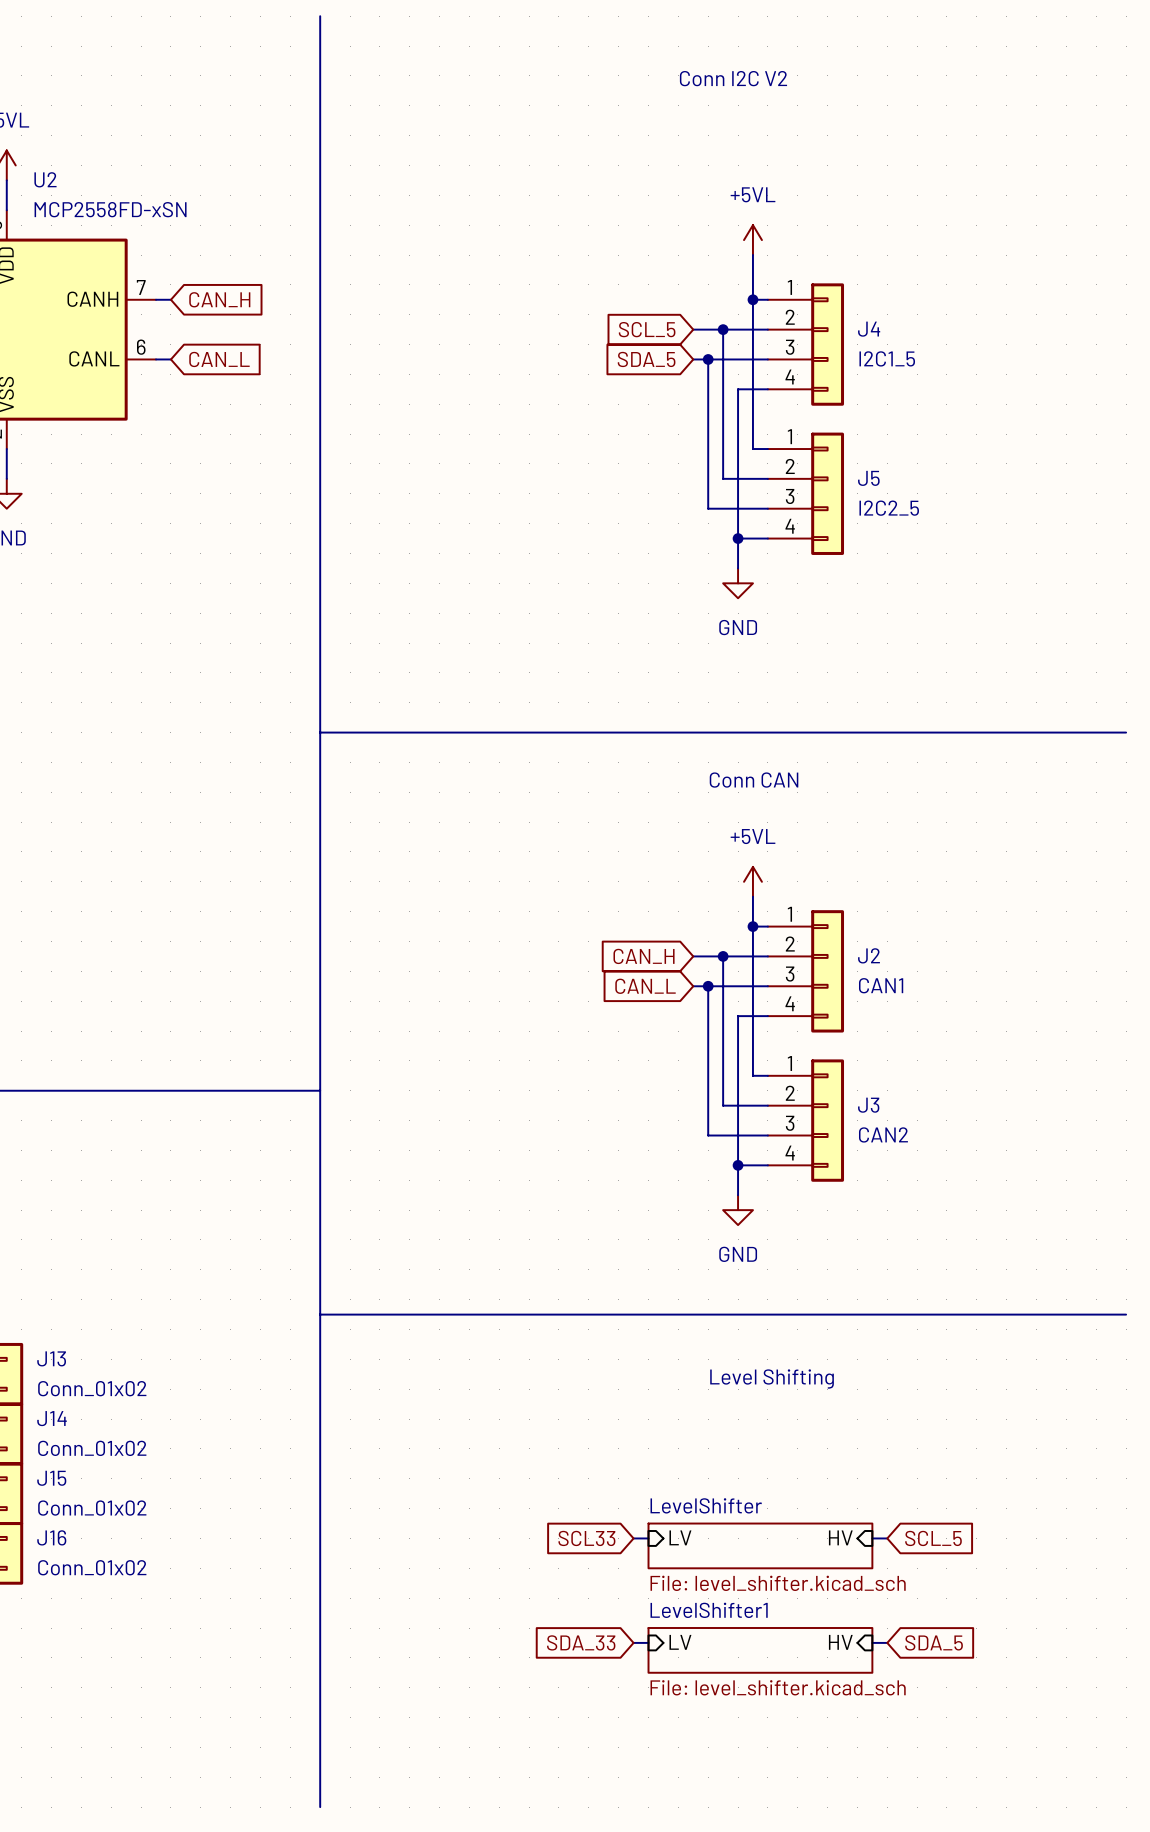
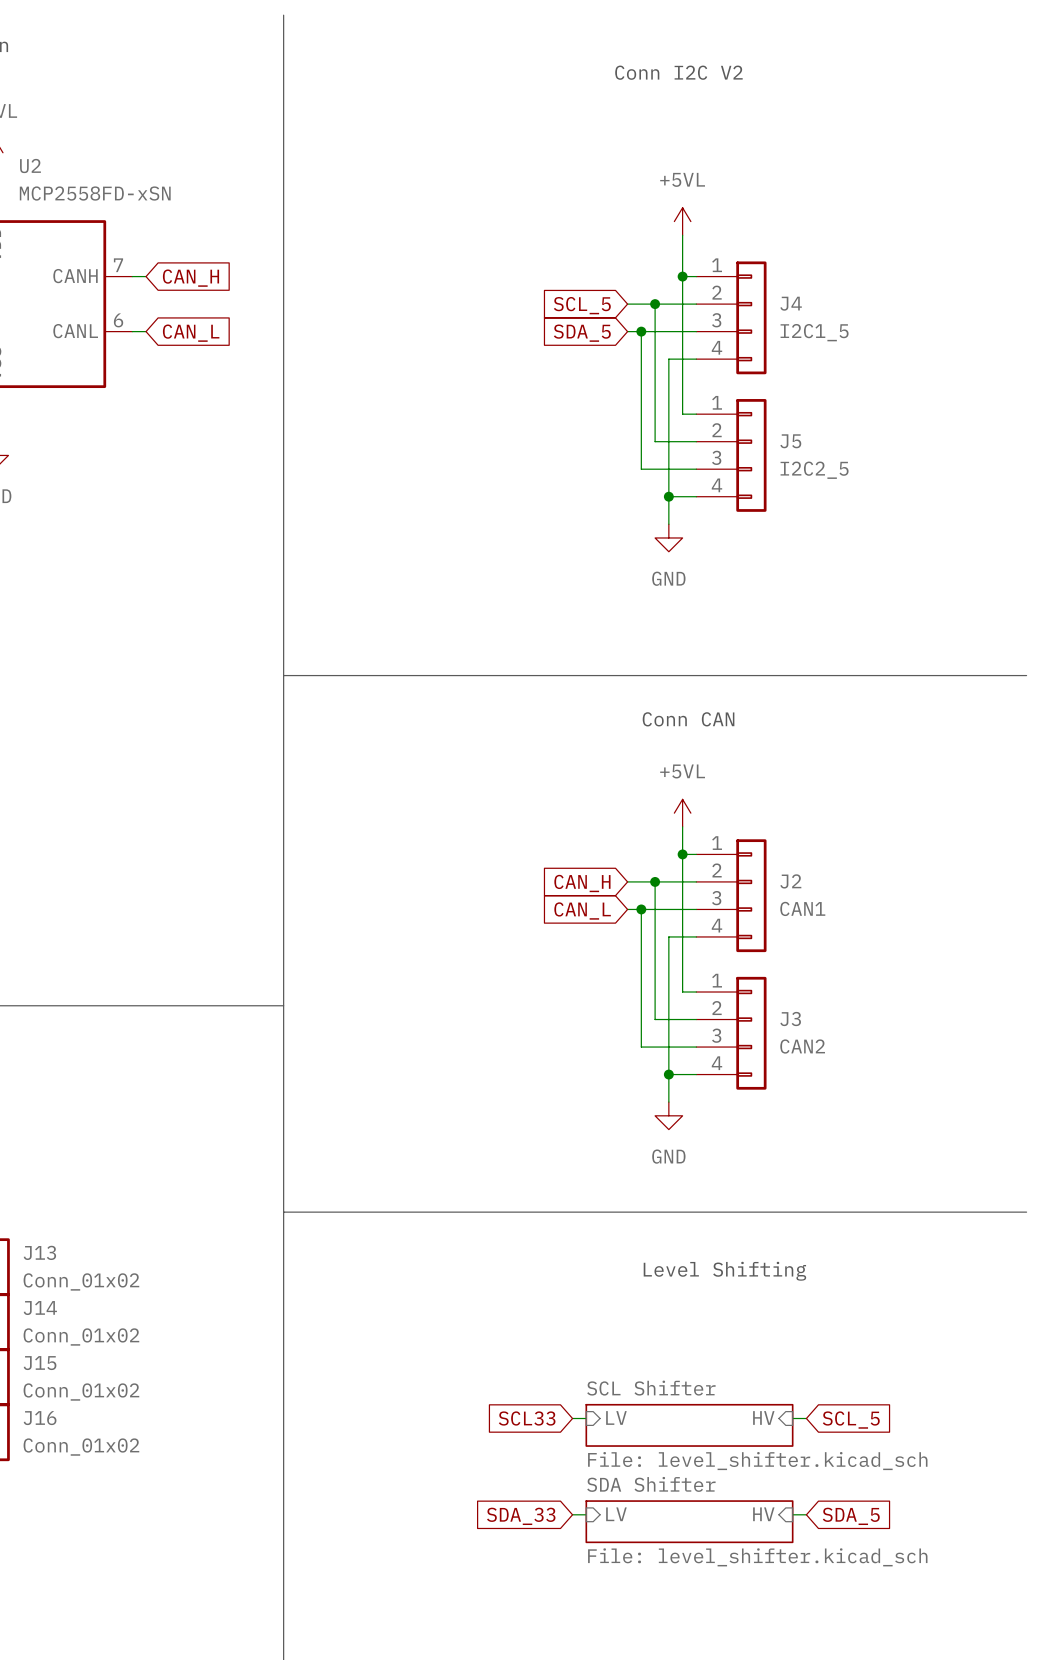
sheet LevelShifter name: LevelShifter (706, 1505) -> SCL Shifter (651, 1388)
sheet LevelShifter1 name: LevelShifter1 (709, 1610) -> SDA Shifter (651, 1484)

